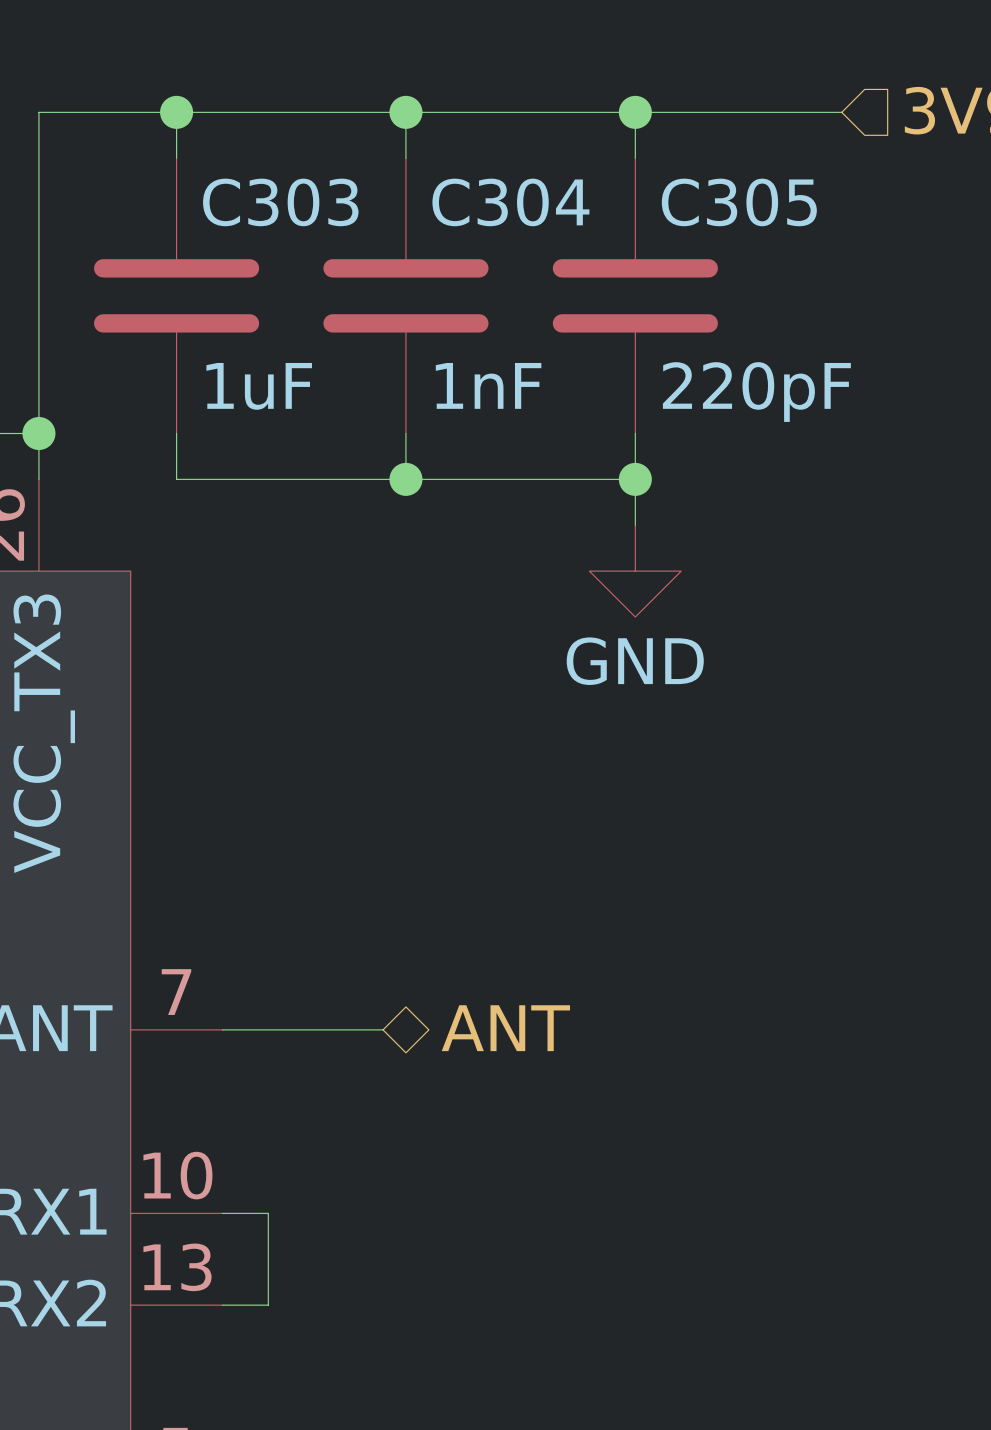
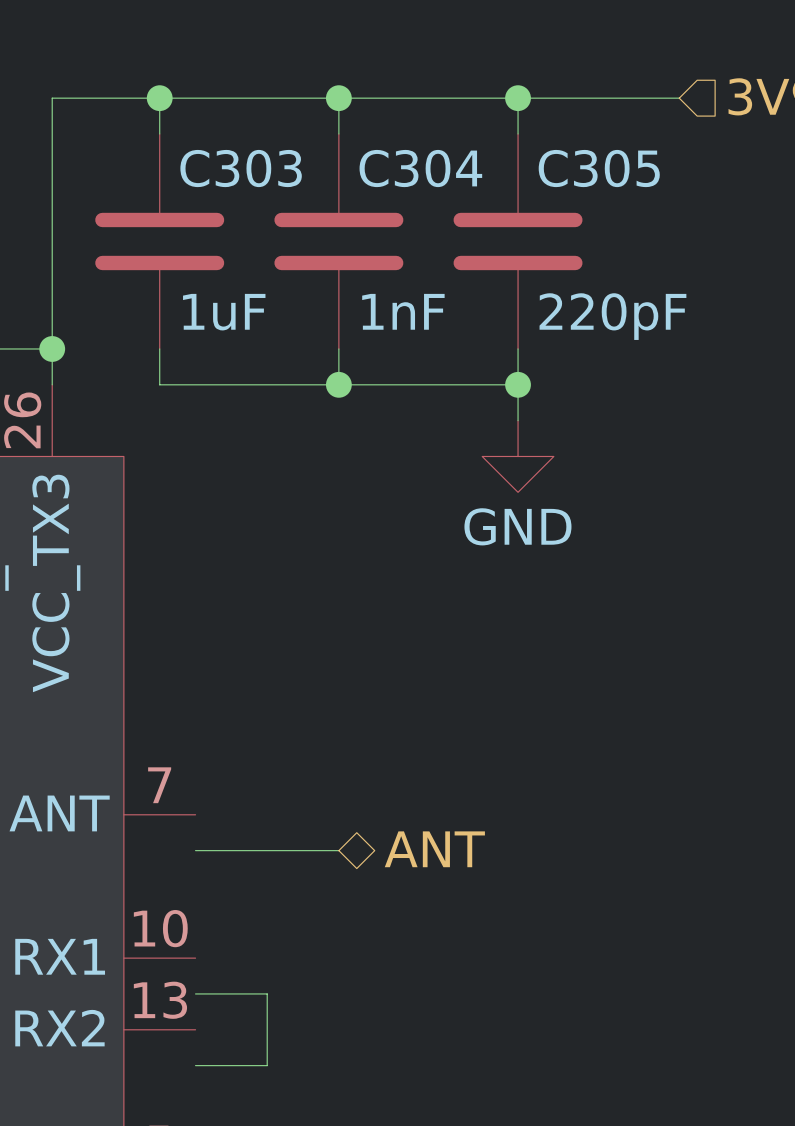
hierarchical label position: ANT (505, 1028) -> ANT (434, 849)
wire: (222, 1029) (383, 1029) -> none
wire: none -> (195, 850) (338, 850)
wire: (222, 1213) (268, 1213) (268, 1305) (222, 1305) -> none
wire: none -> (195, 993) (267, 993) (267, 1065) (195, 1065)

